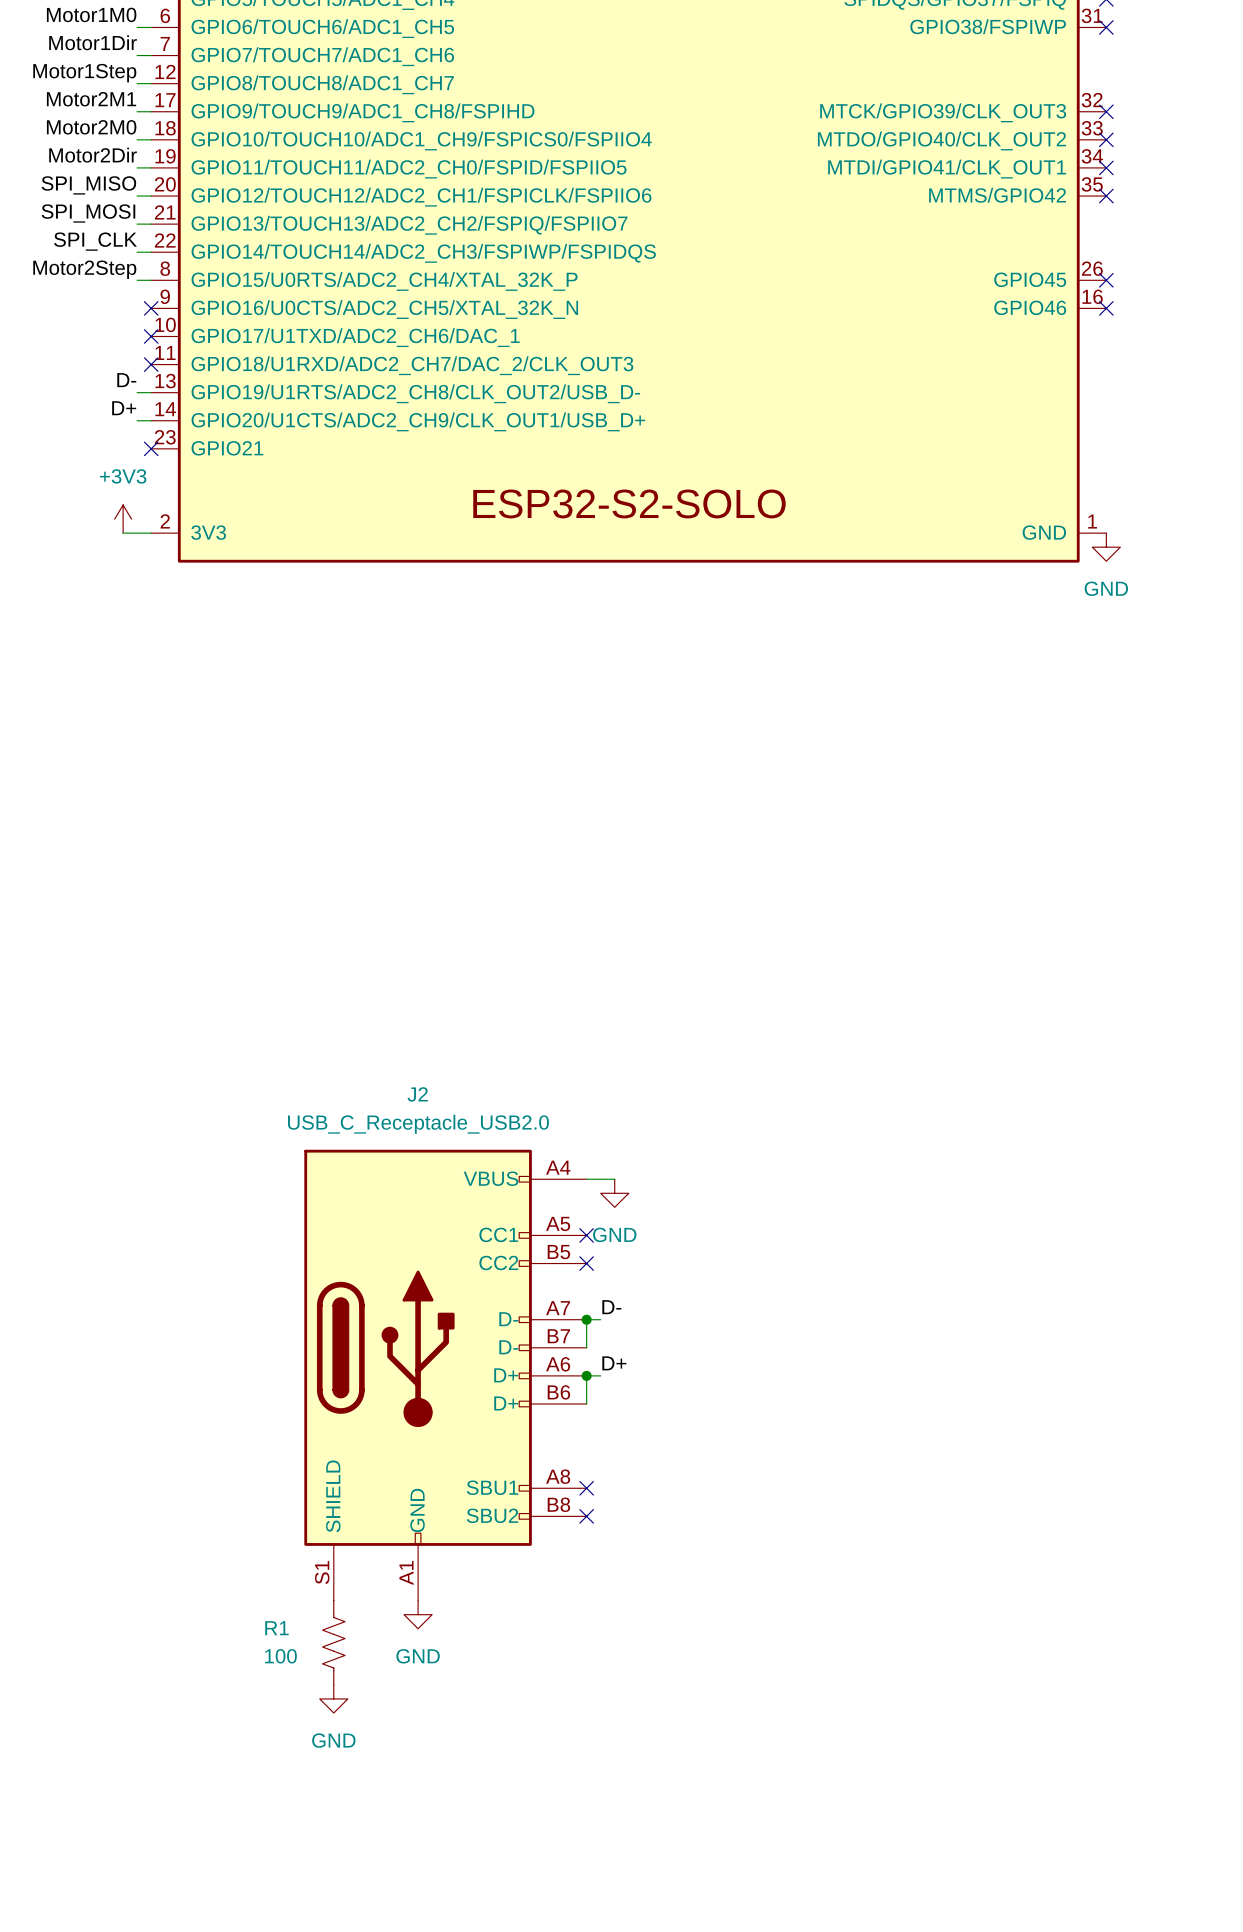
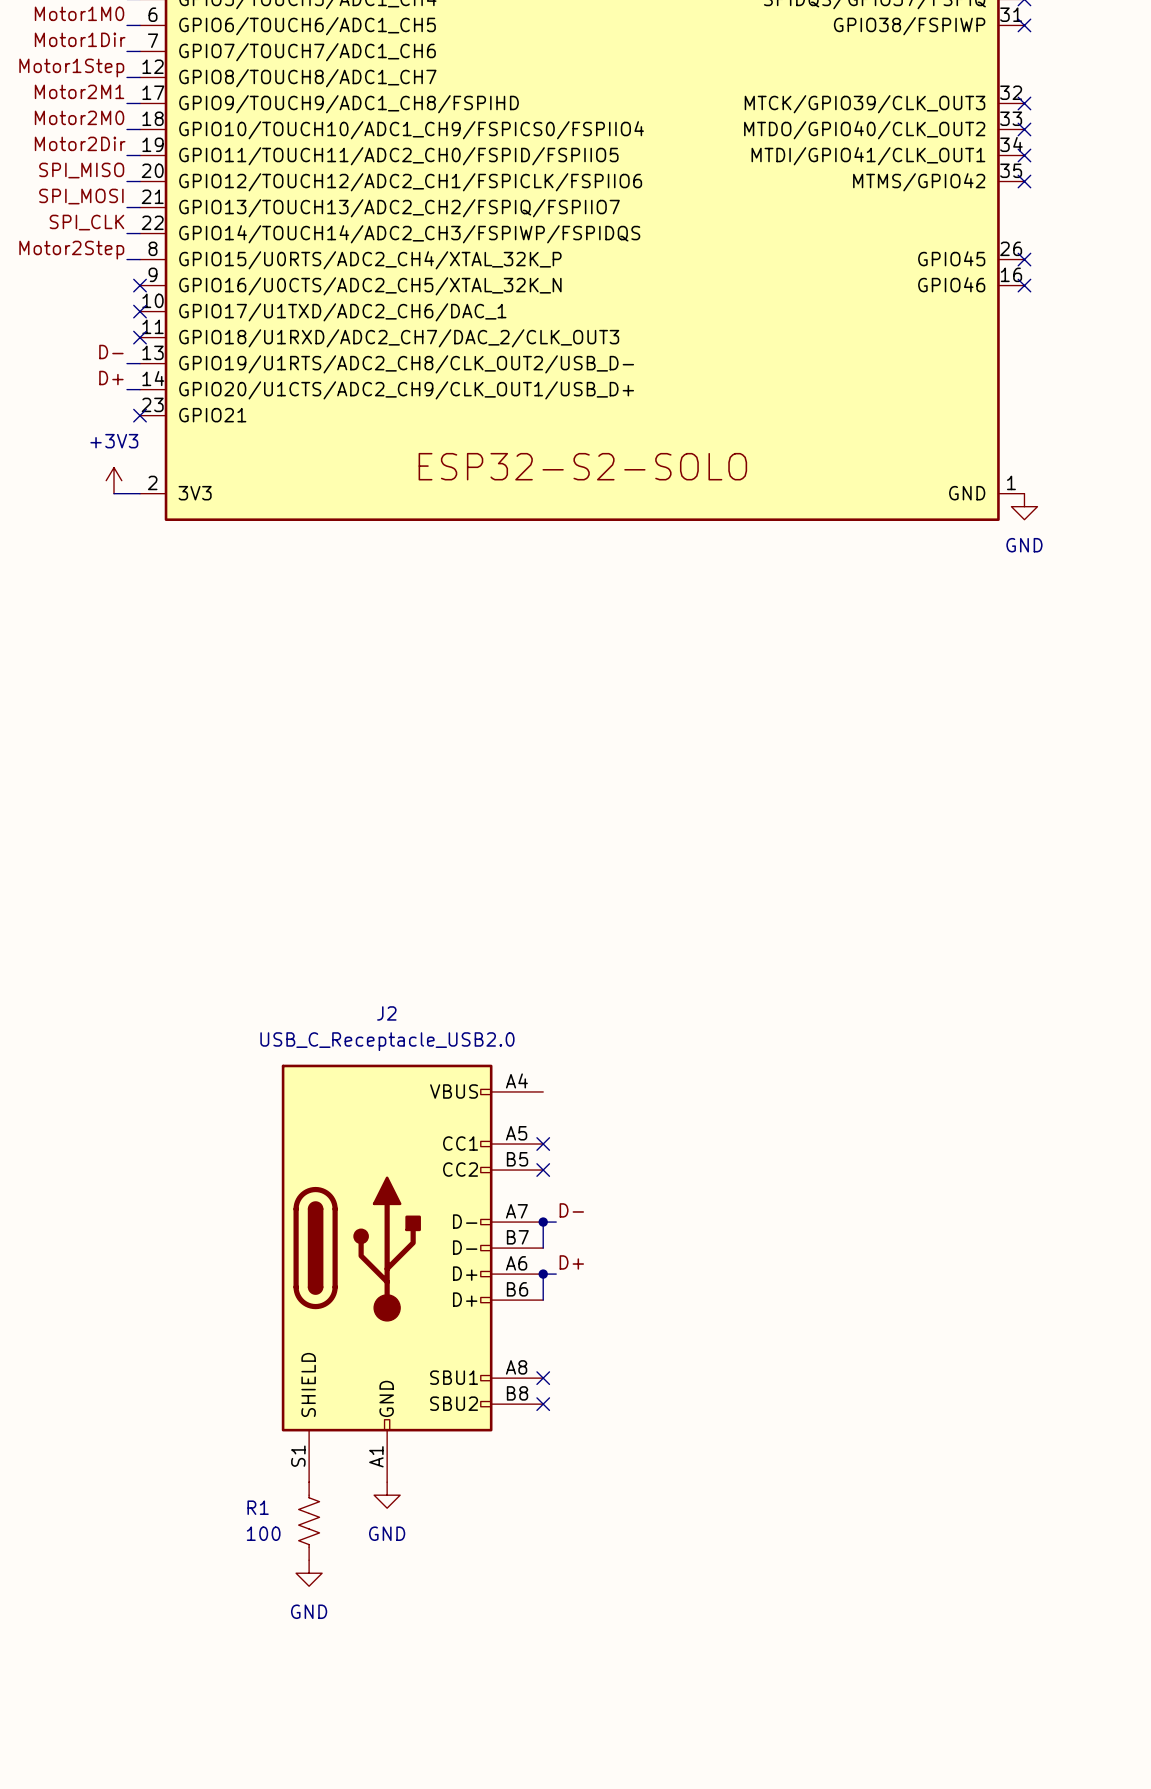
wire: (586, 1179) (614, 1179) -> none
power symbol: GND (614, 1193) -> none

